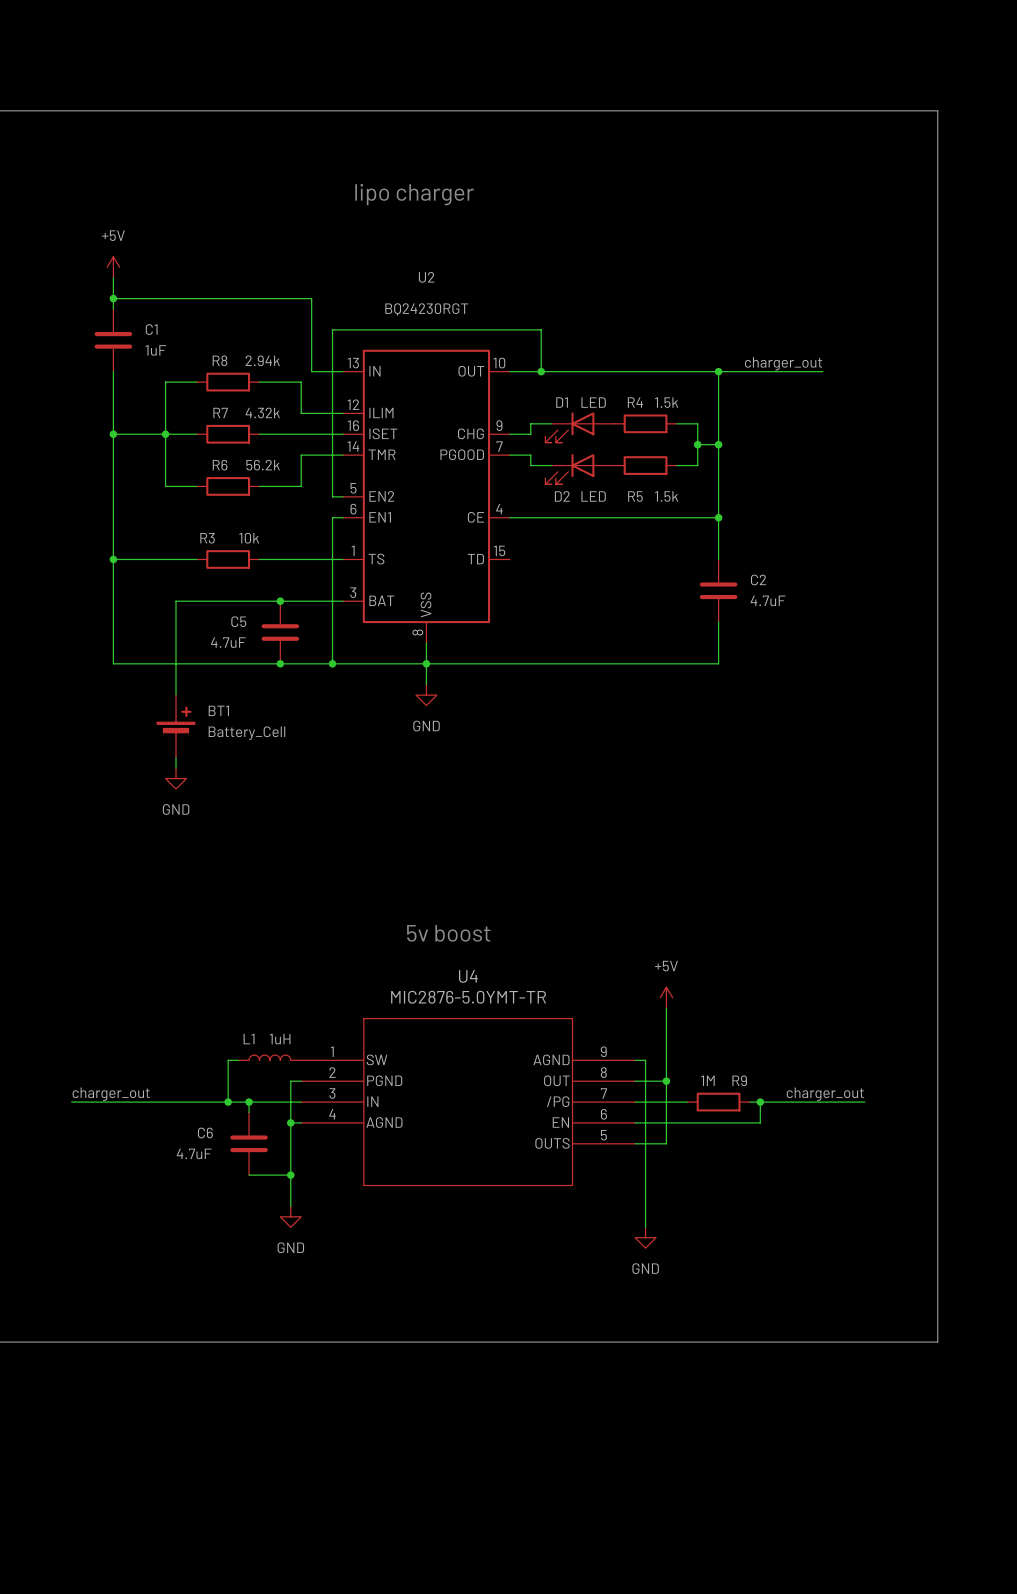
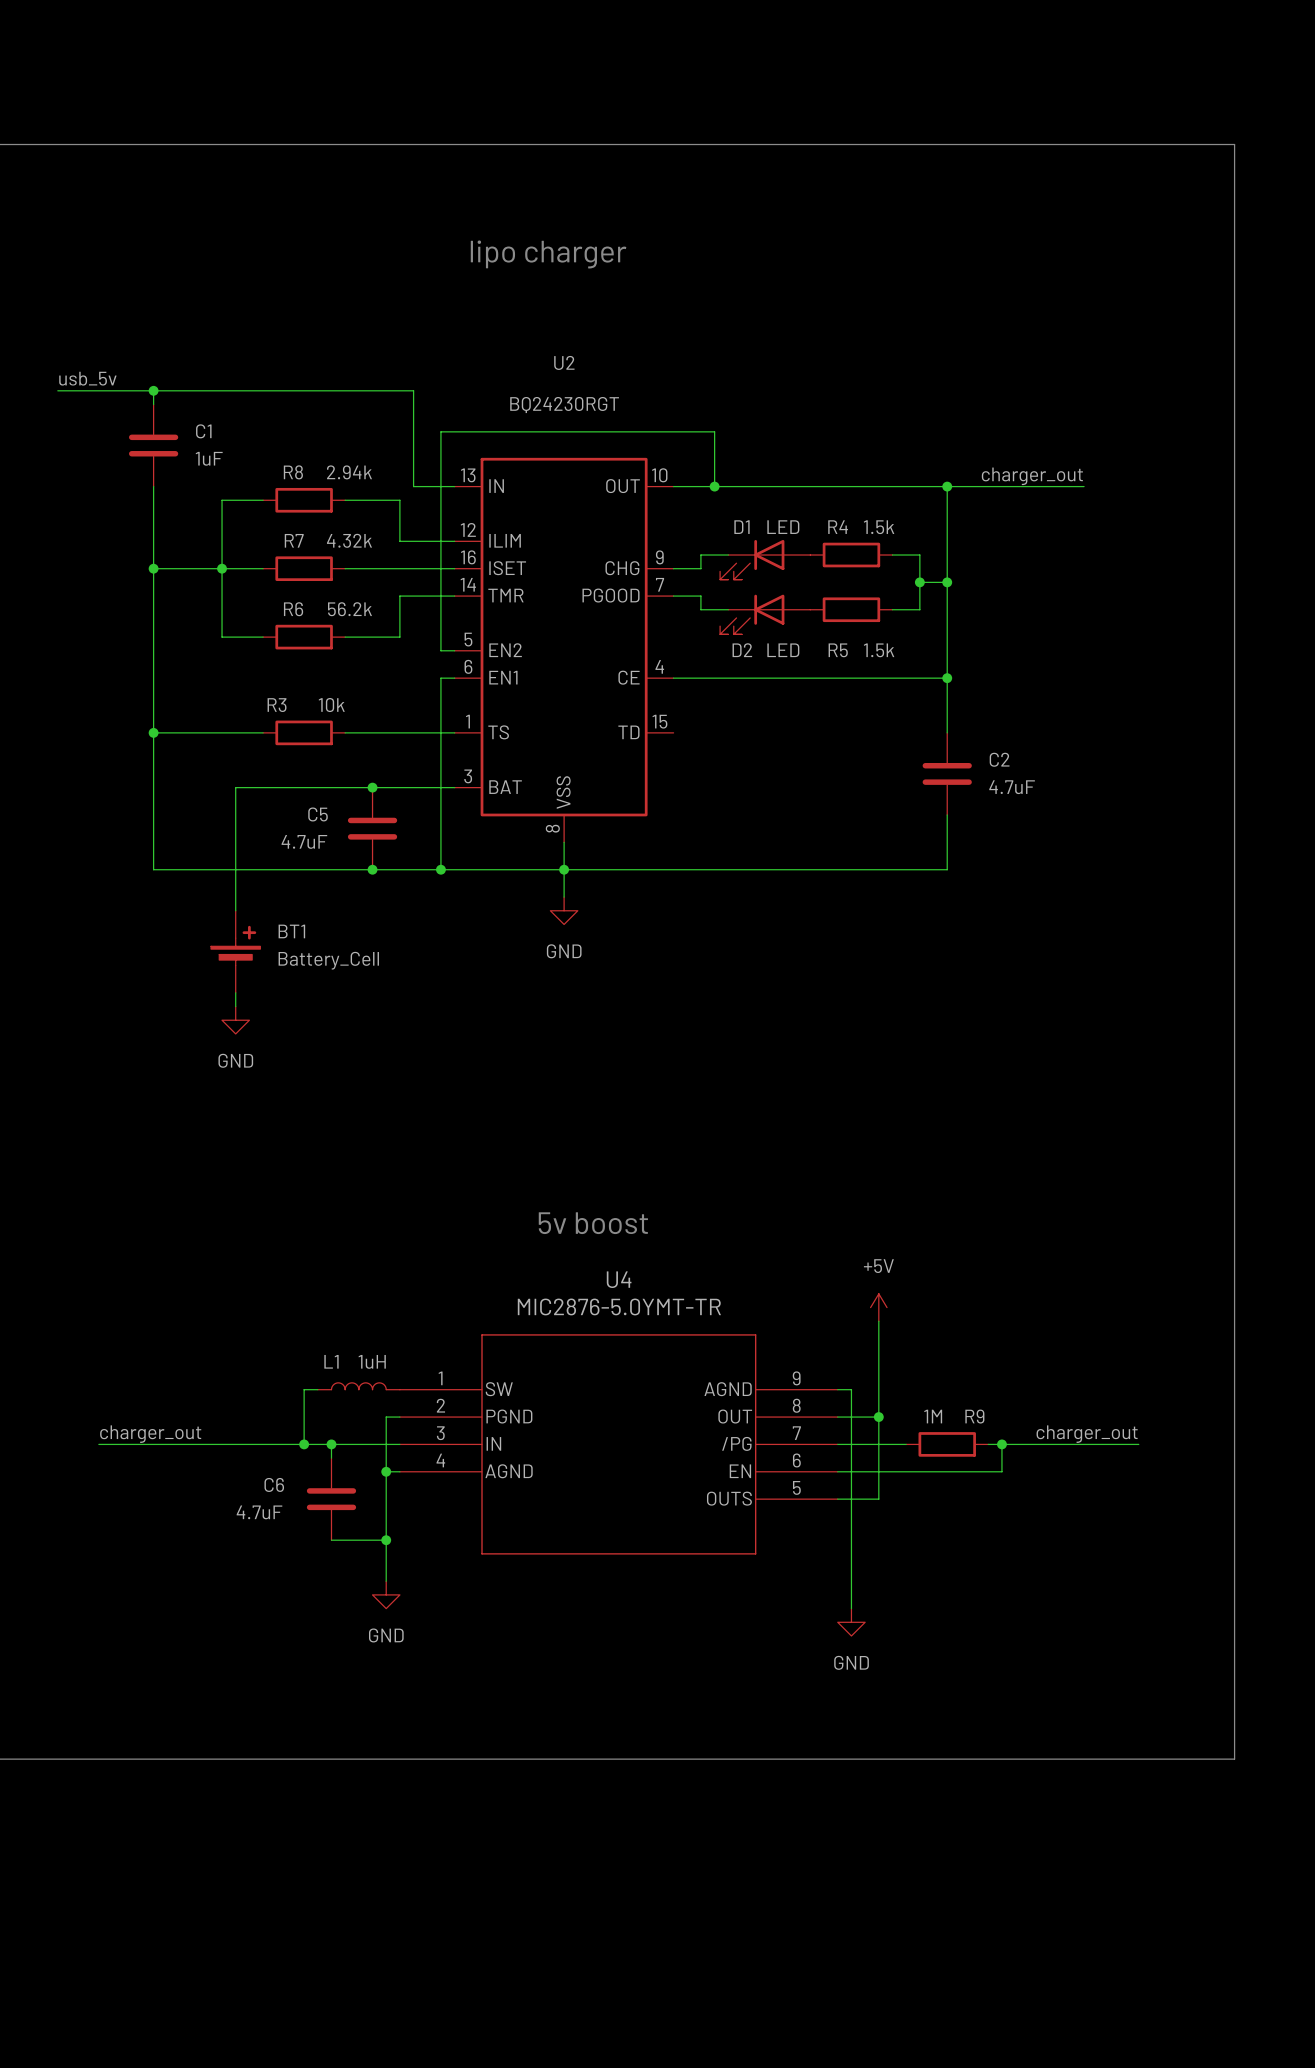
power symbol: +5V (113, 267) -> none
wire: (113, 277) (113, 298) -> (57, 390) (153, 390)
label: none -> usb_5v (87, 378)

